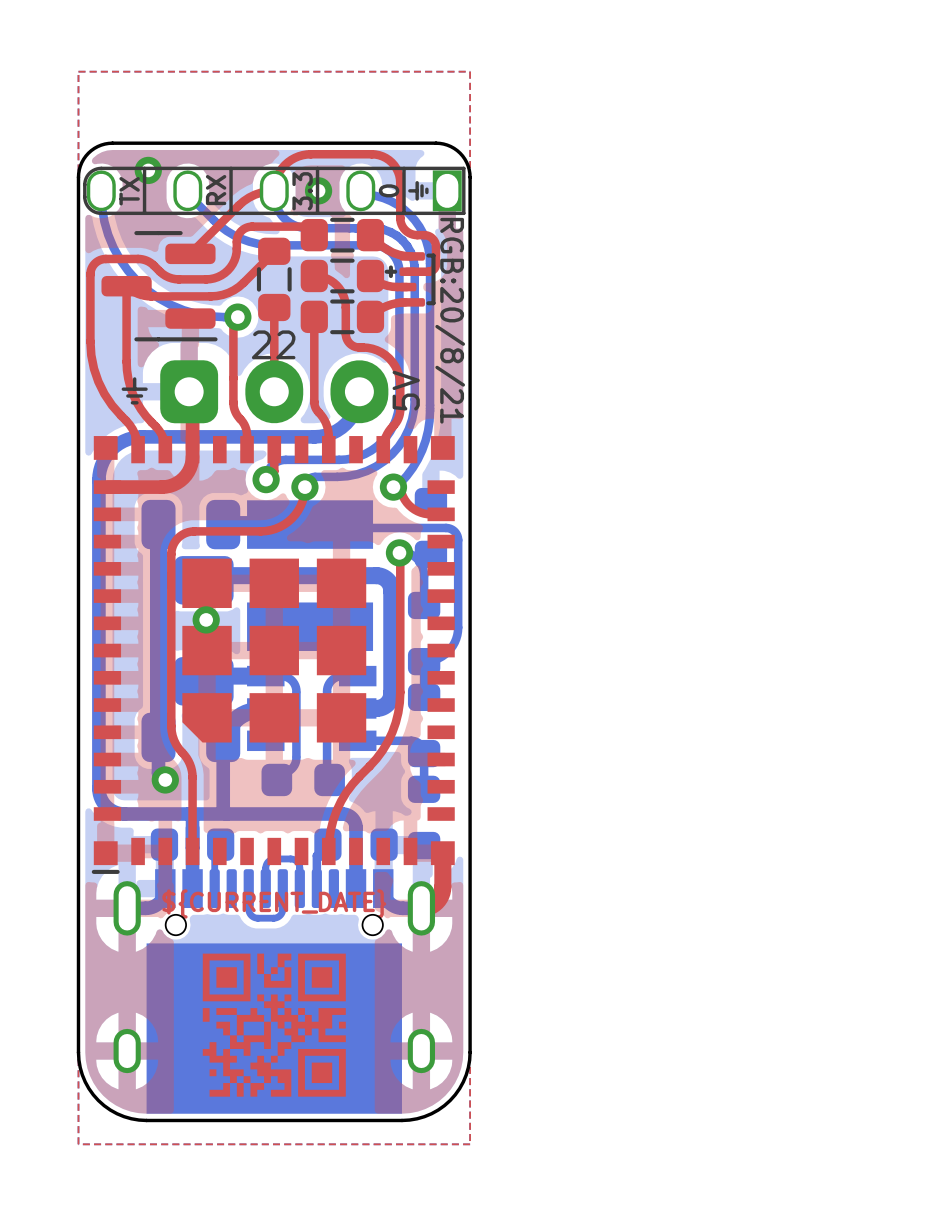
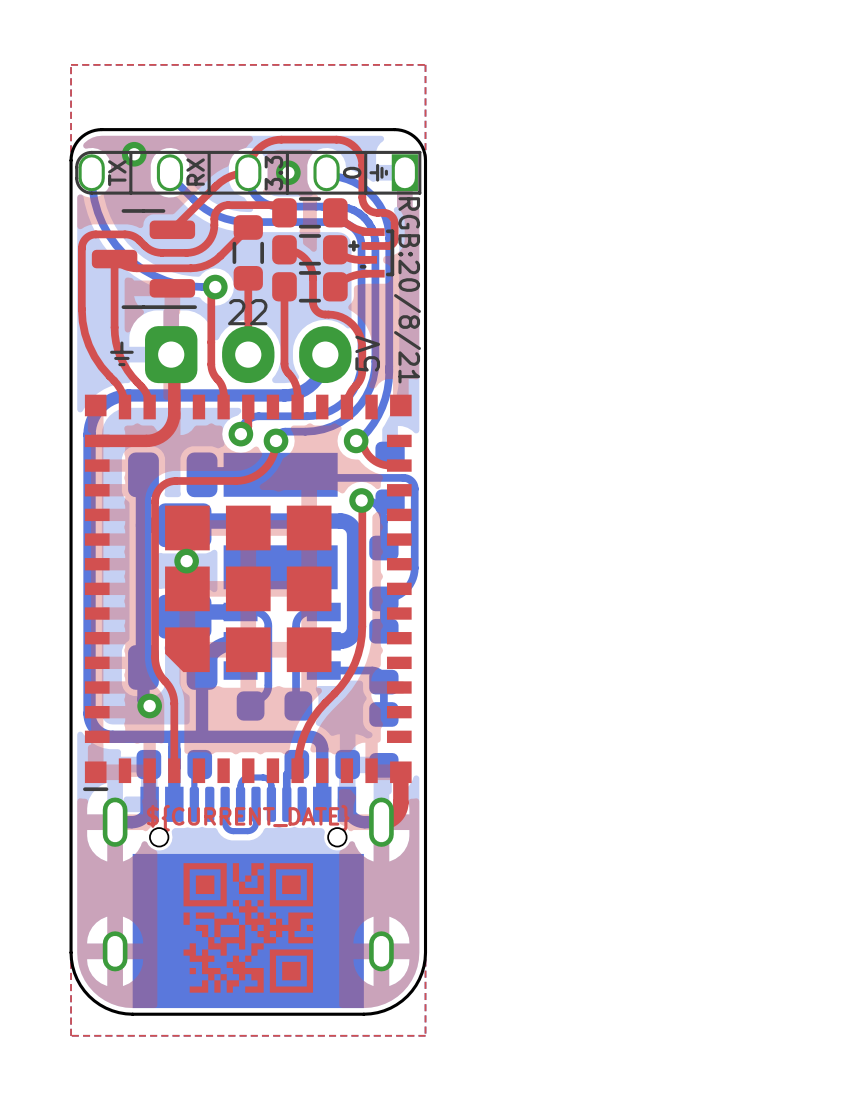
part footprint: [384, 252, 436, 307] -> [348, 228, 395, 278]

